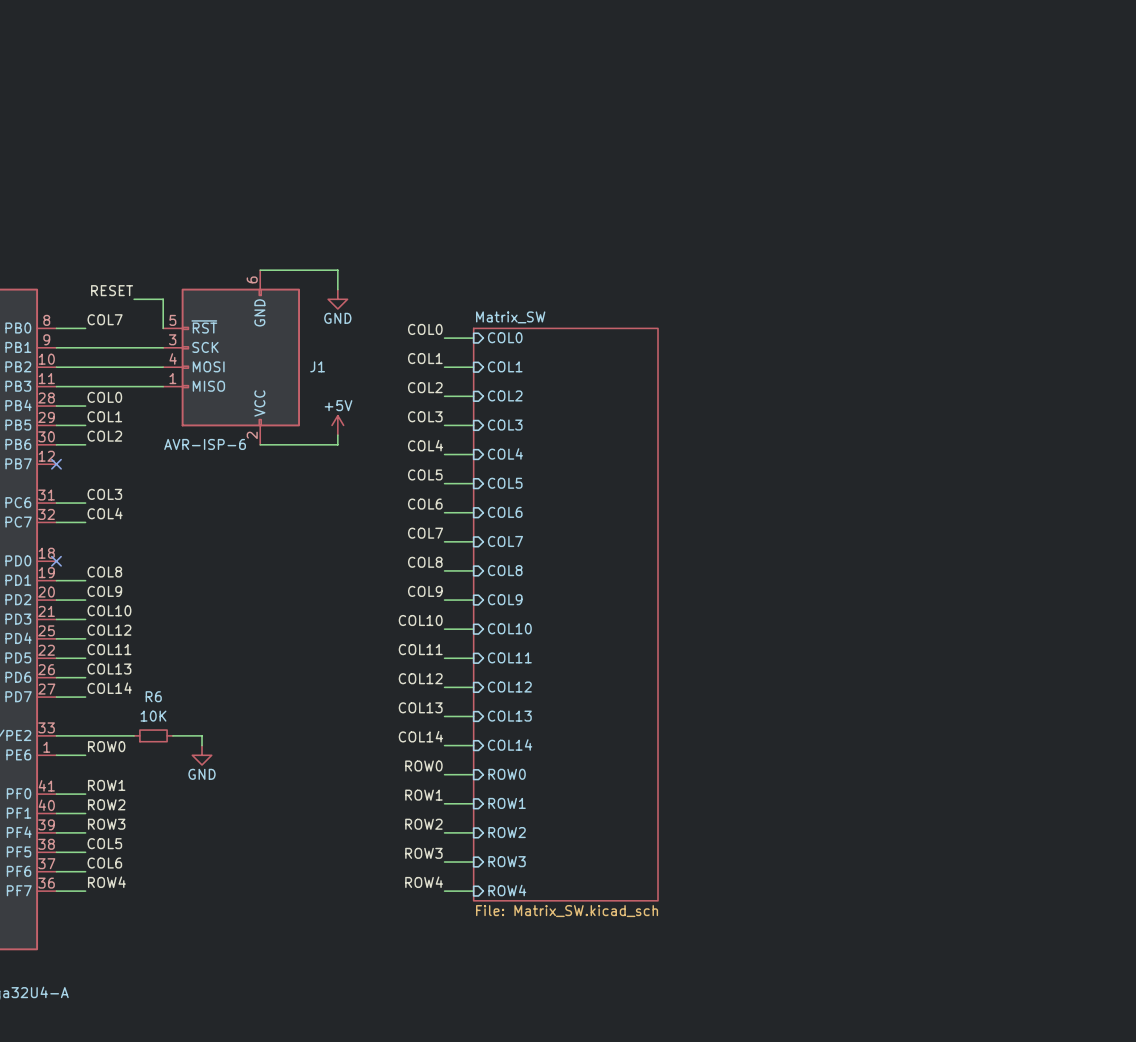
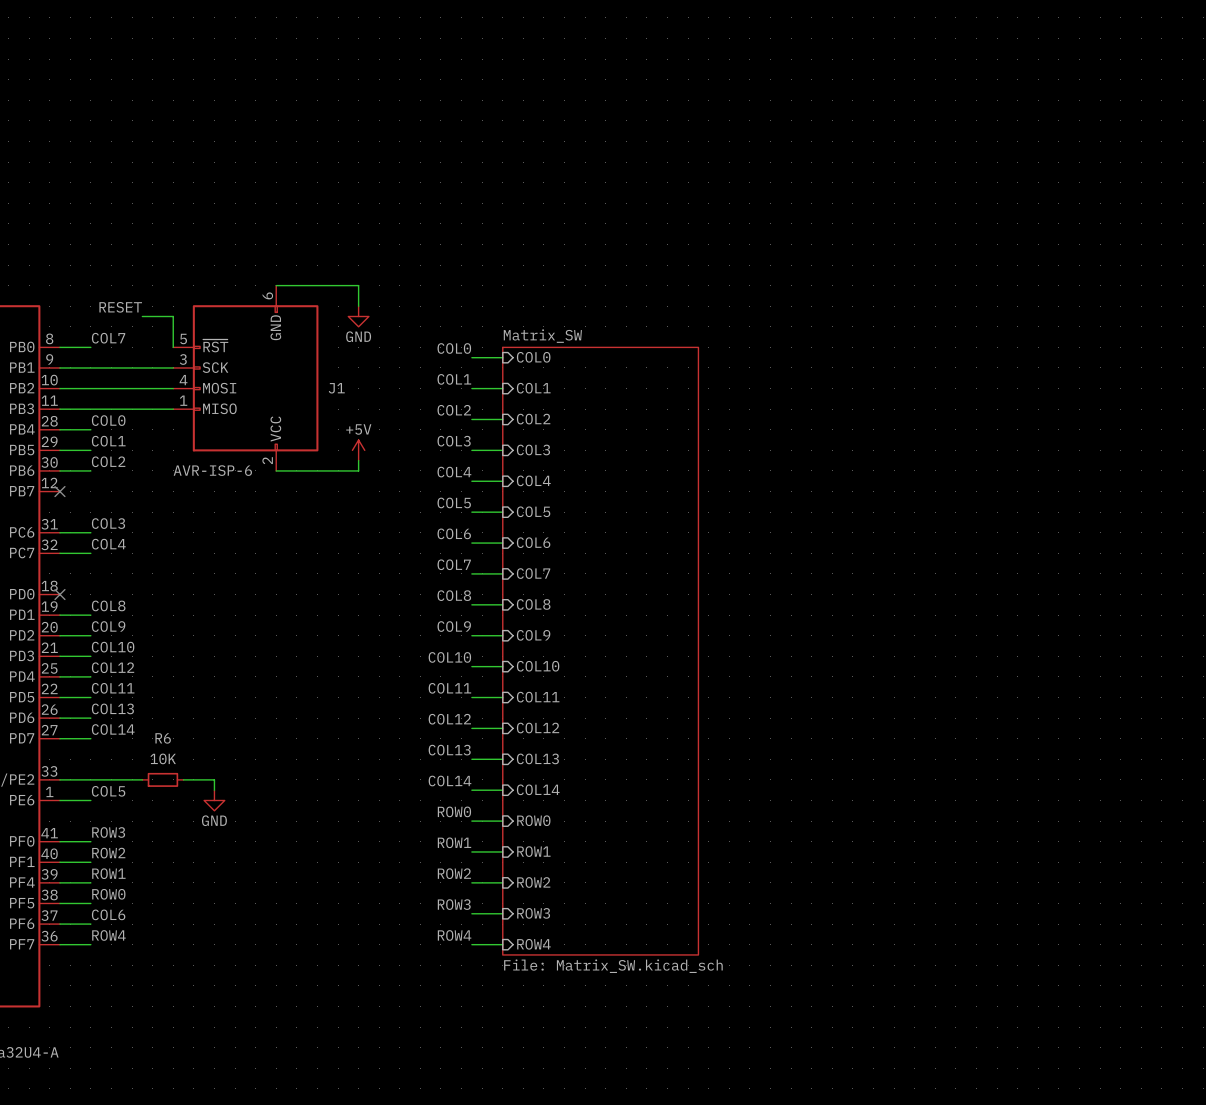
label: ROW0 (106, 746) -> COL5 (108, 791)
label: ROW1 (106, 785) -> ROW3 (108, 832)
label: ROW3 (106, 824) -> ROW1 (108, 873)
label: COL5 (104, 843) -> ROW0 (108, 894)

